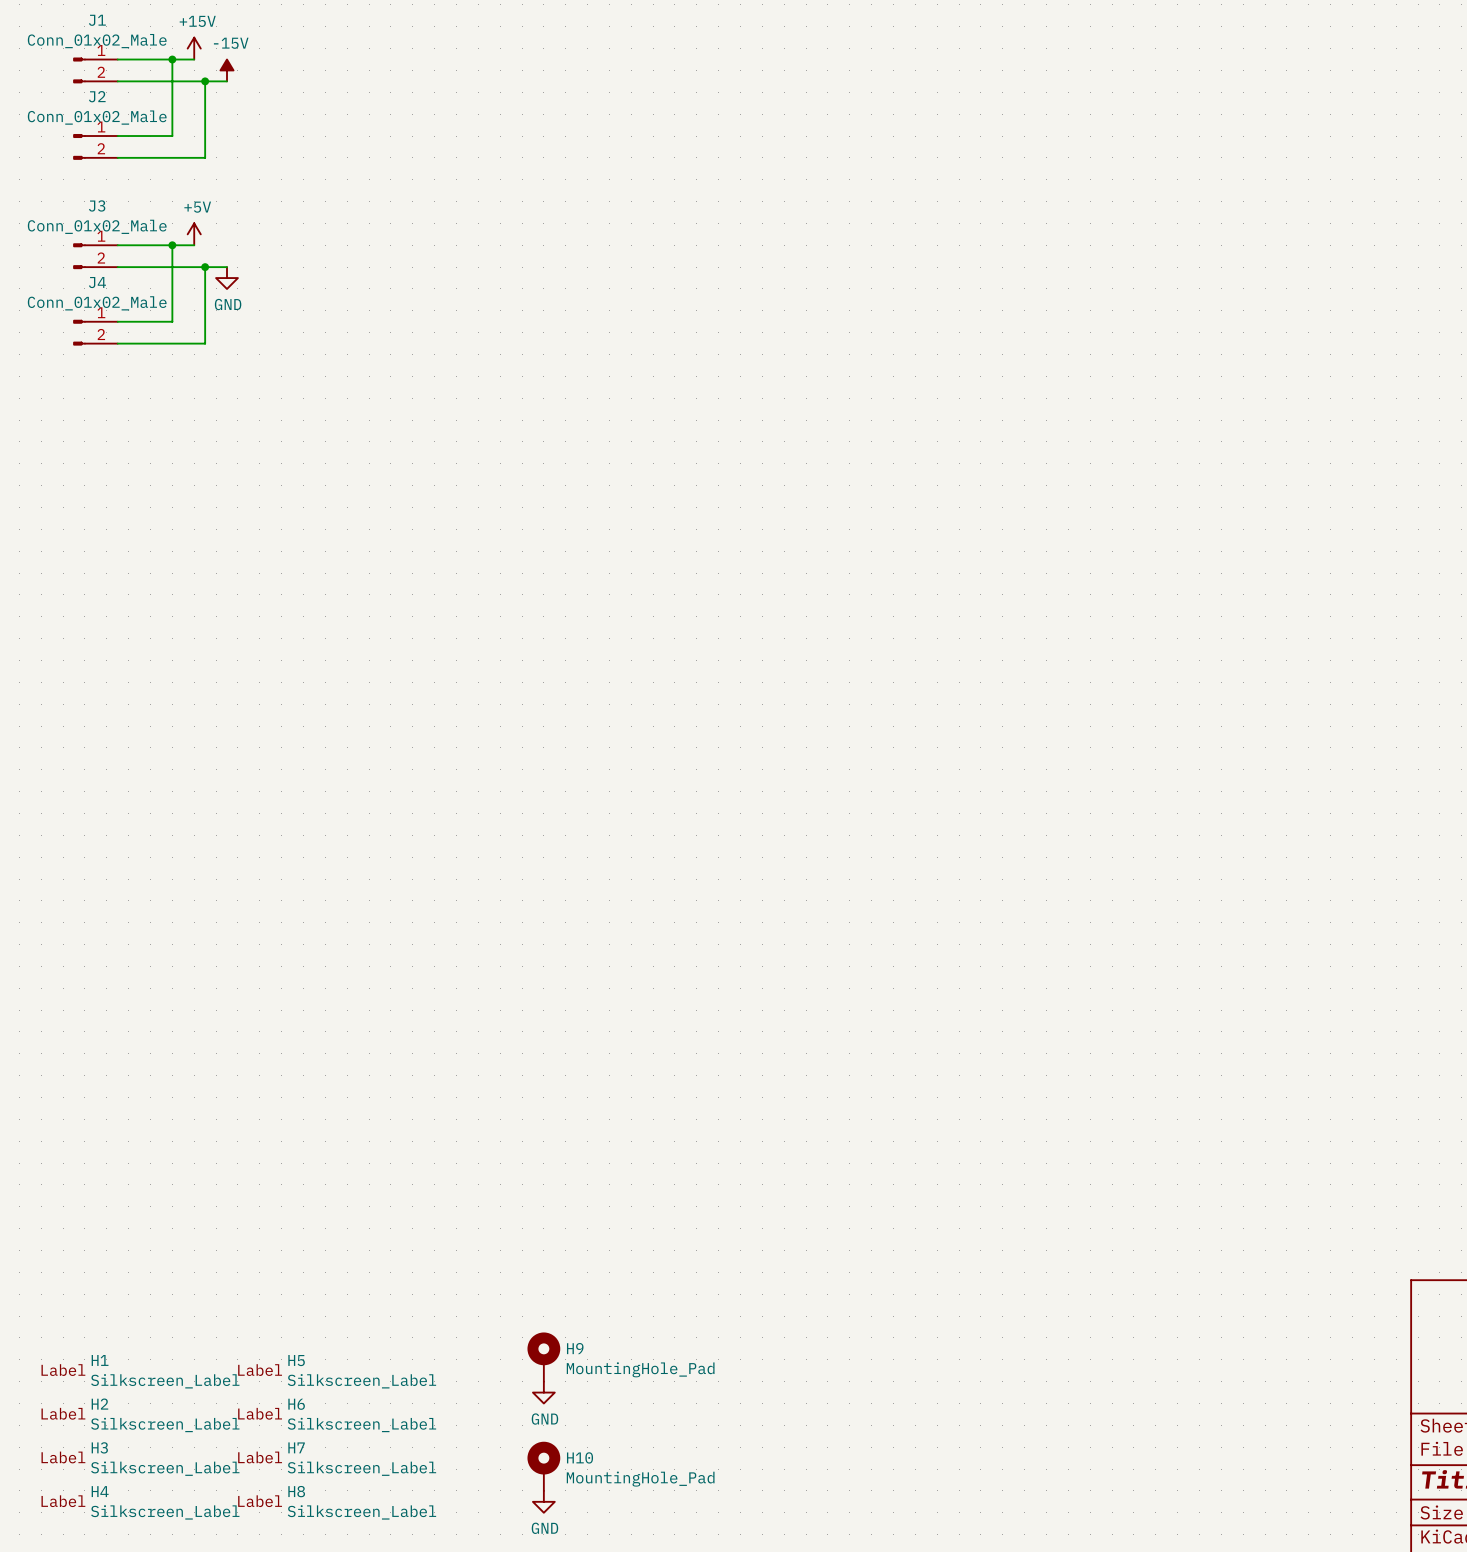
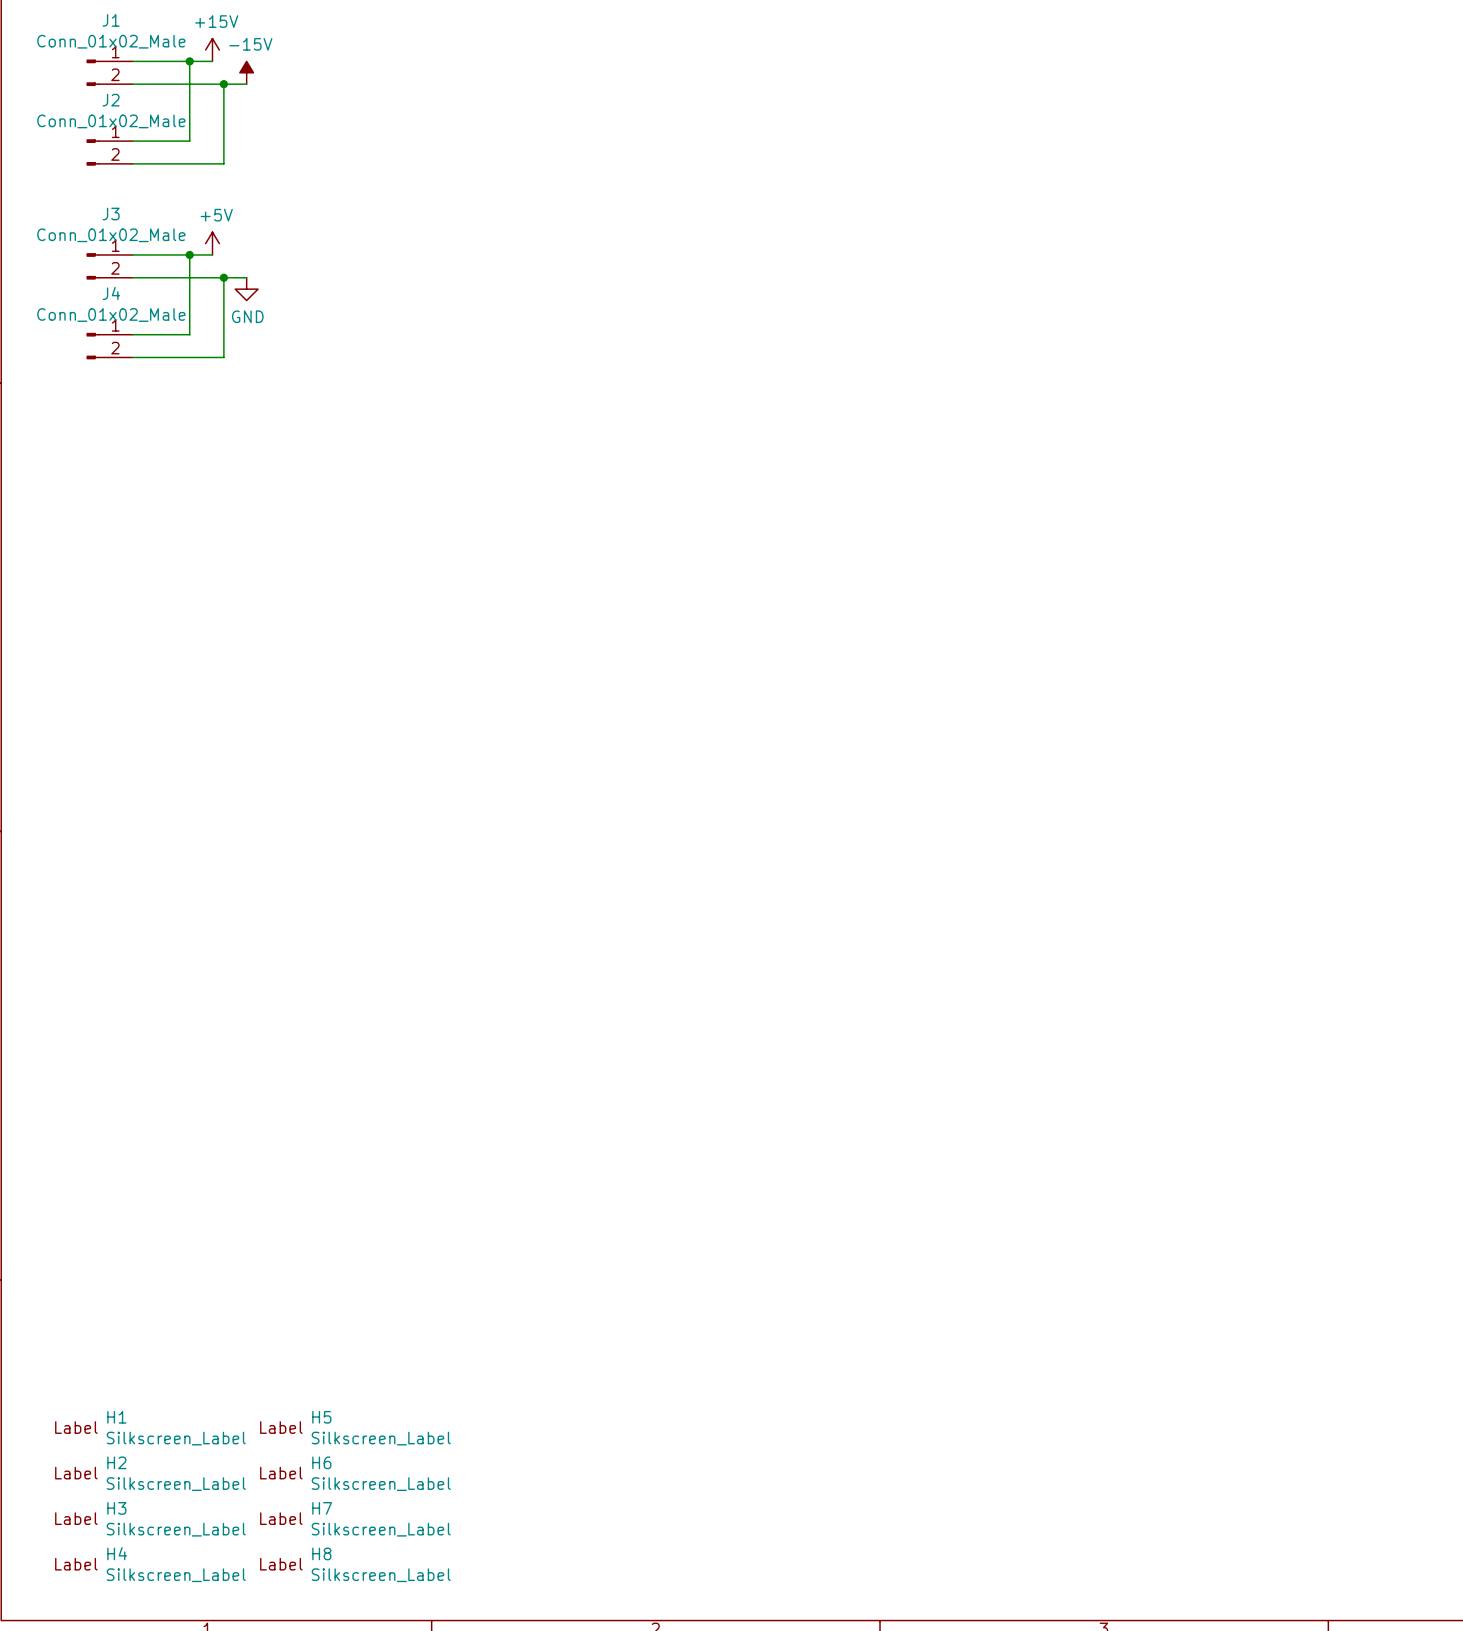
H9: MountingHole_Pad (543, 1357) -> none
power symbol: GND (543, 1392) -> none
H10: MountingHole_Pad (543, 1466) -> none
power symbol: GND (543, 1501) -> none

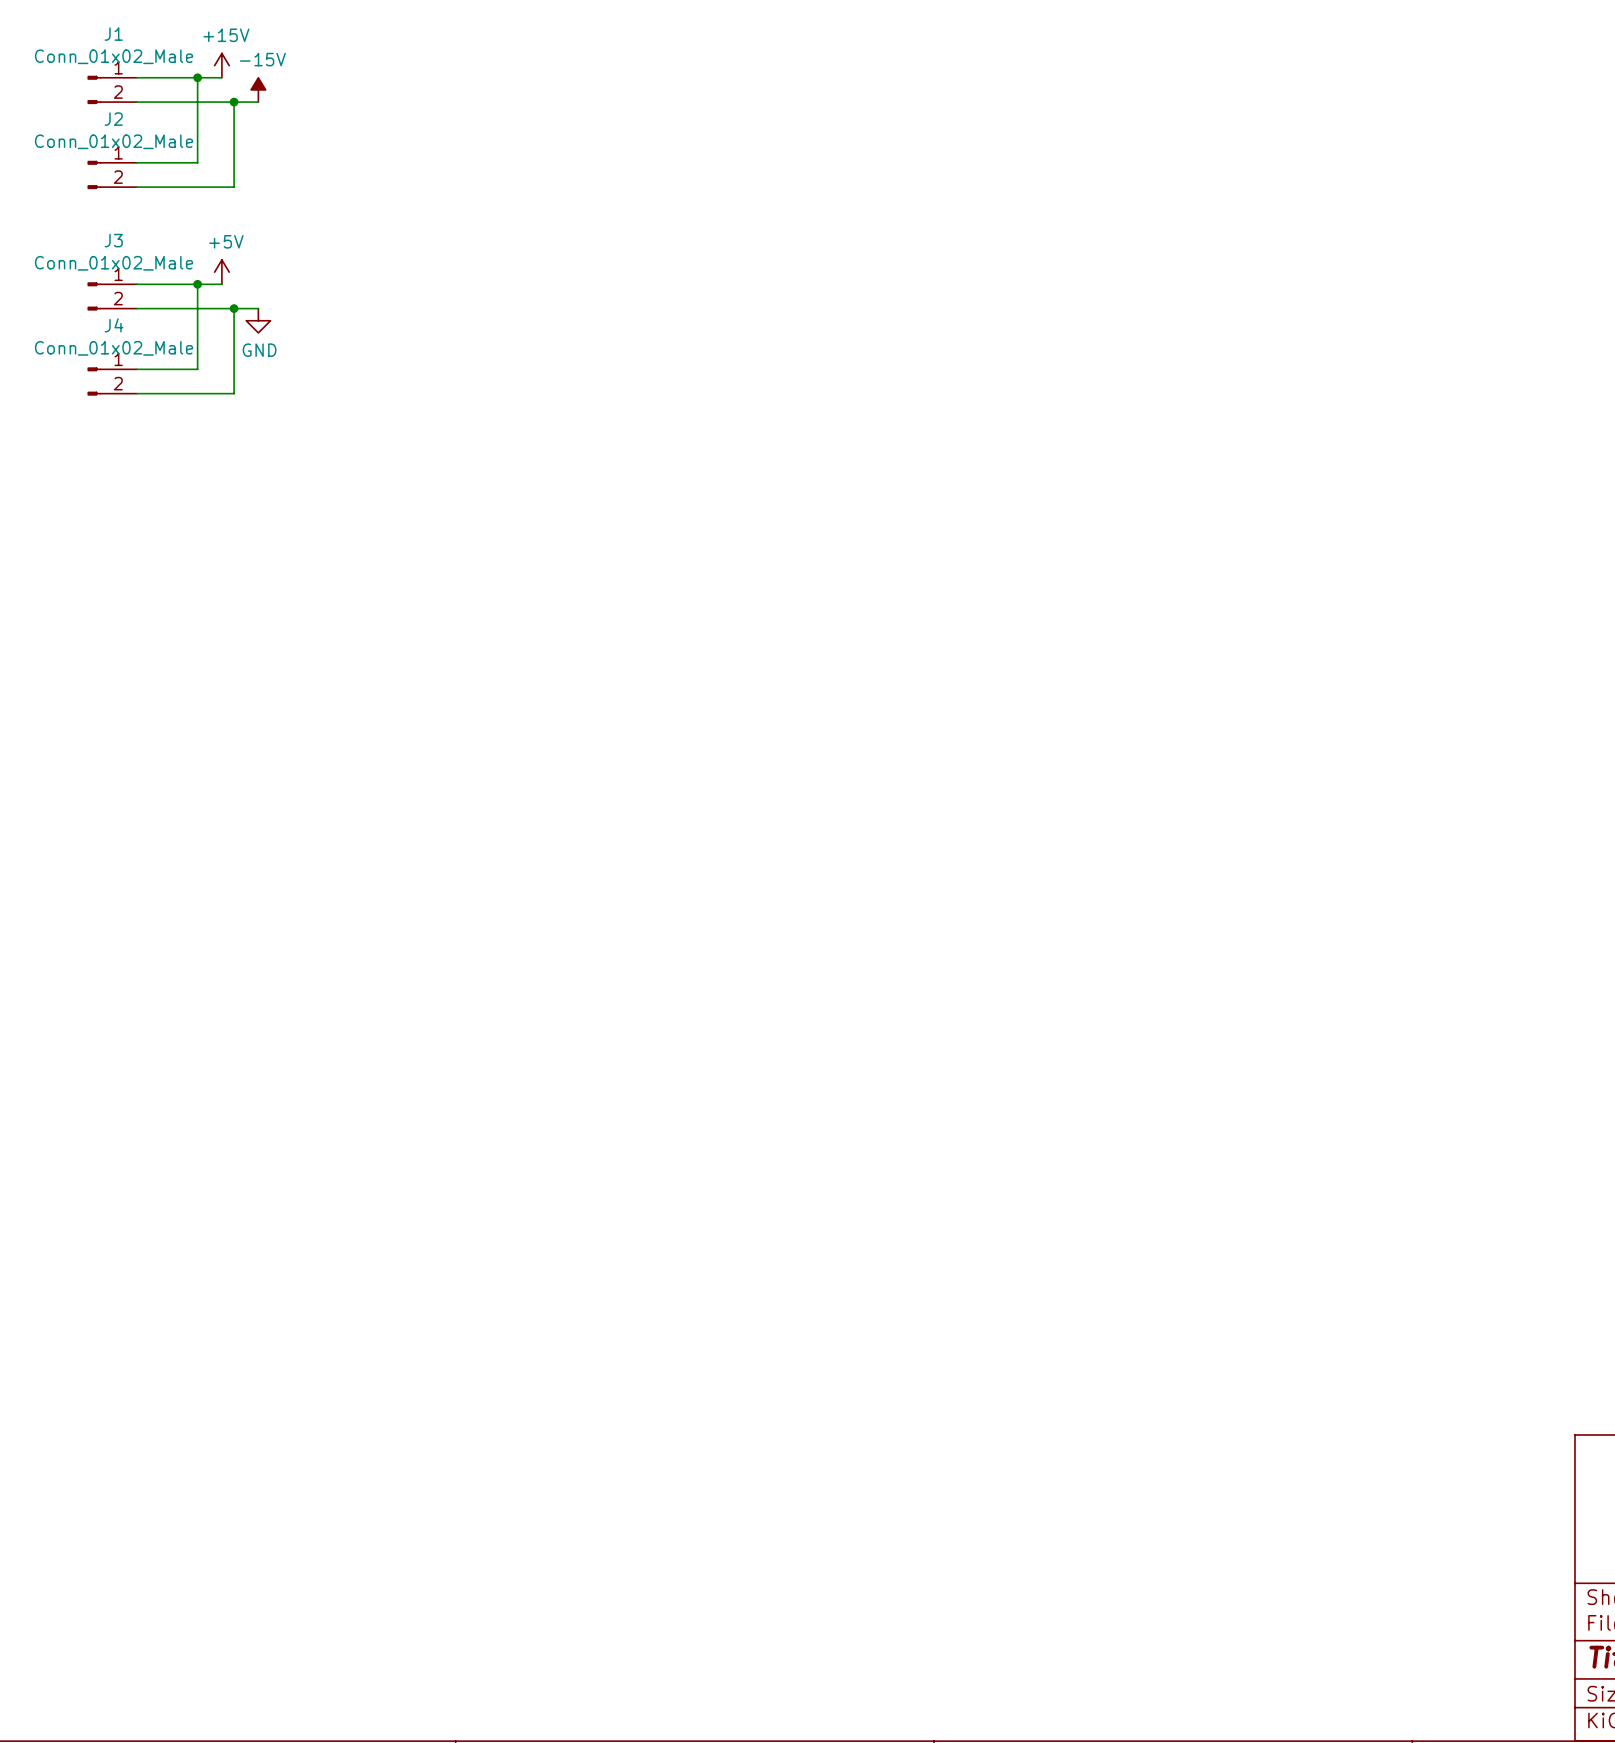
H1: Silkscreen_Label (150, 1428) -> none
H5: Silkscreen_Label (355, 1428) -> none
H2: Silkscreen_Label (150, 1473) -> none
H6: Silkscreen_Label (355, 1473) -> none
H3: Silkscreen_Label (150, 1519) -> none
H7: Silkscreen_Label (355, 1519) -> none
H4: Silkscreen_Label (150, 1564) -> none
H8: Silkscreen_Label (355, 1564) -> none

